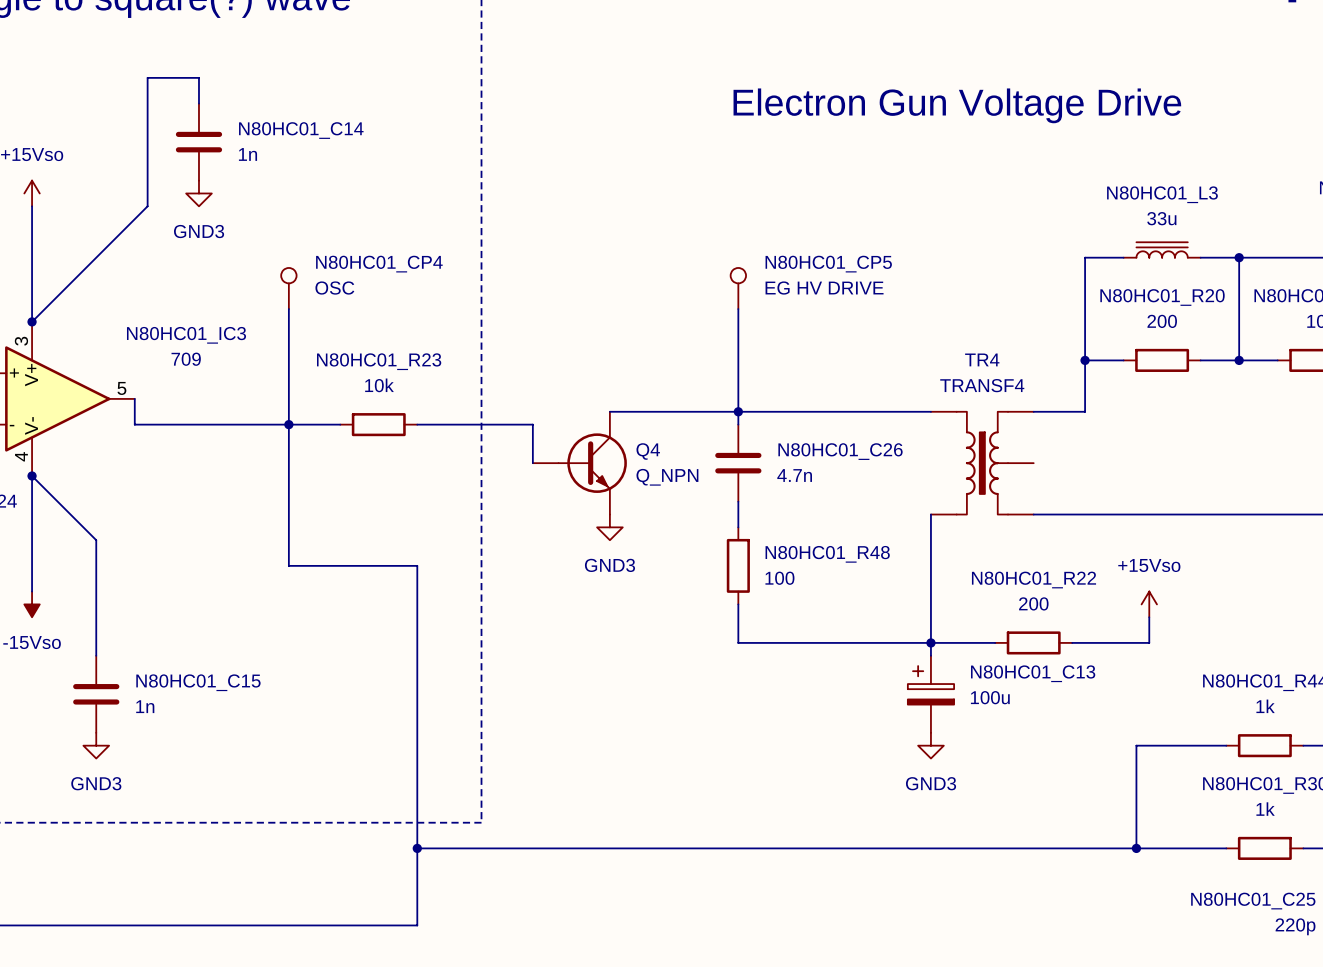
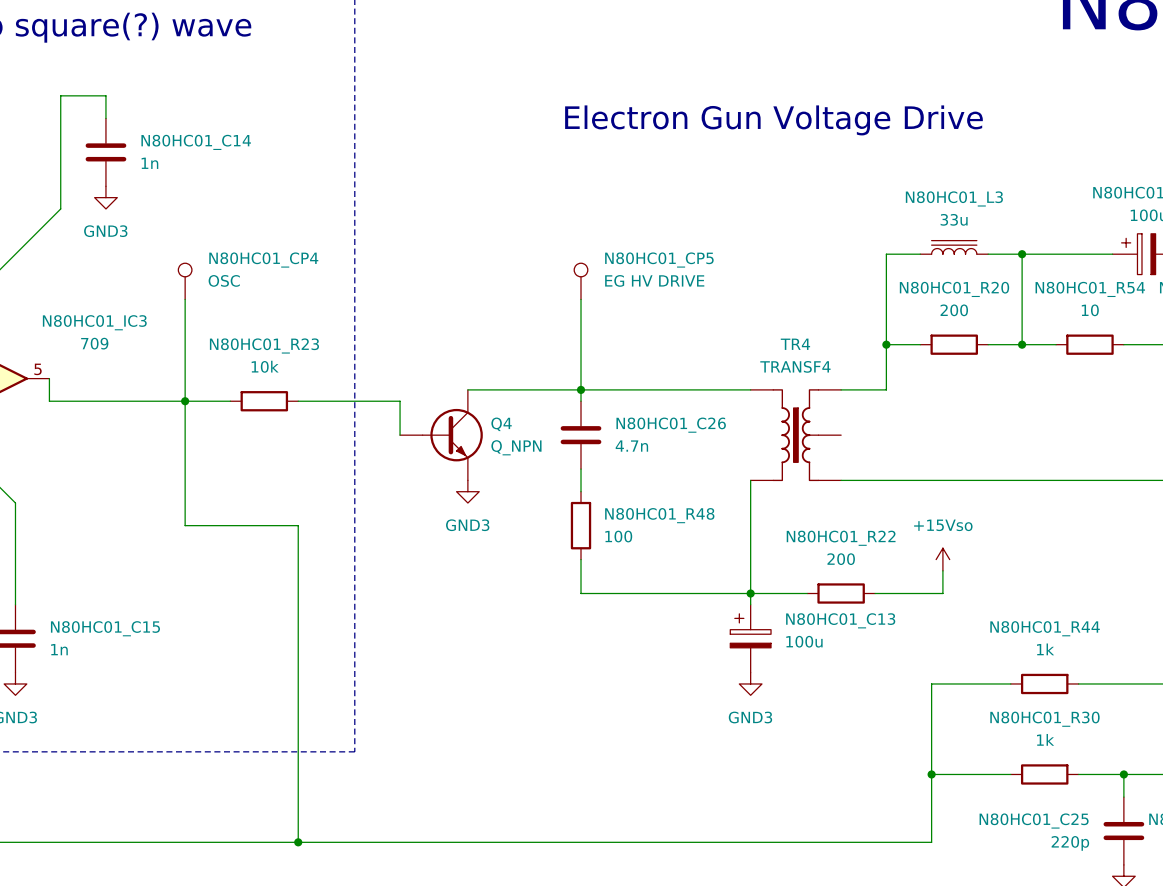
wire: (417, 848) (1136, 848) -> (298, 842) (931, 842) (931, 774)
junction: (417, 848) -> none
junction: none -> (298, 842)

